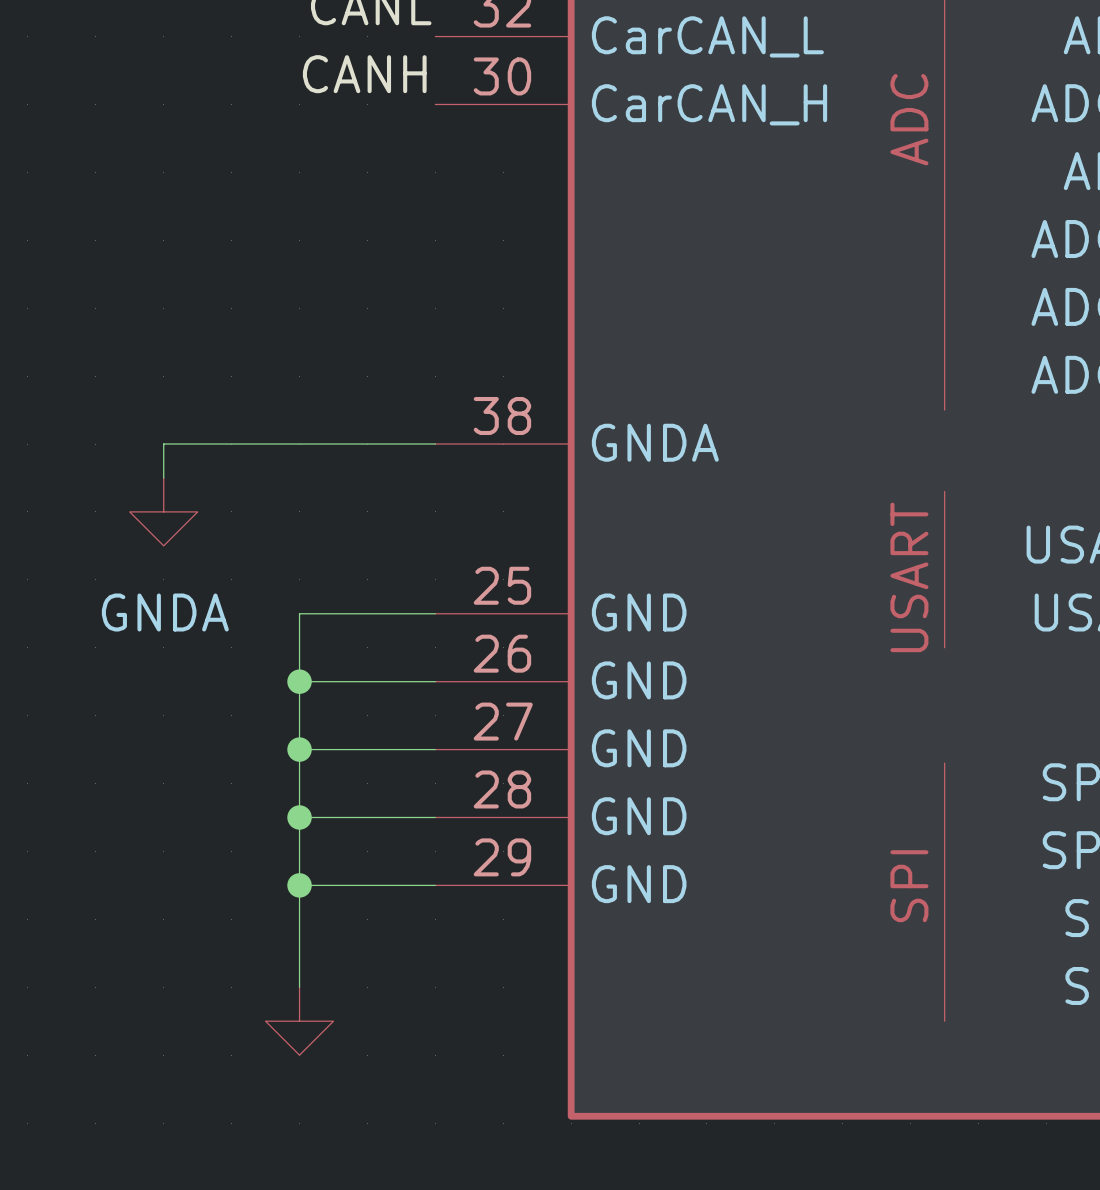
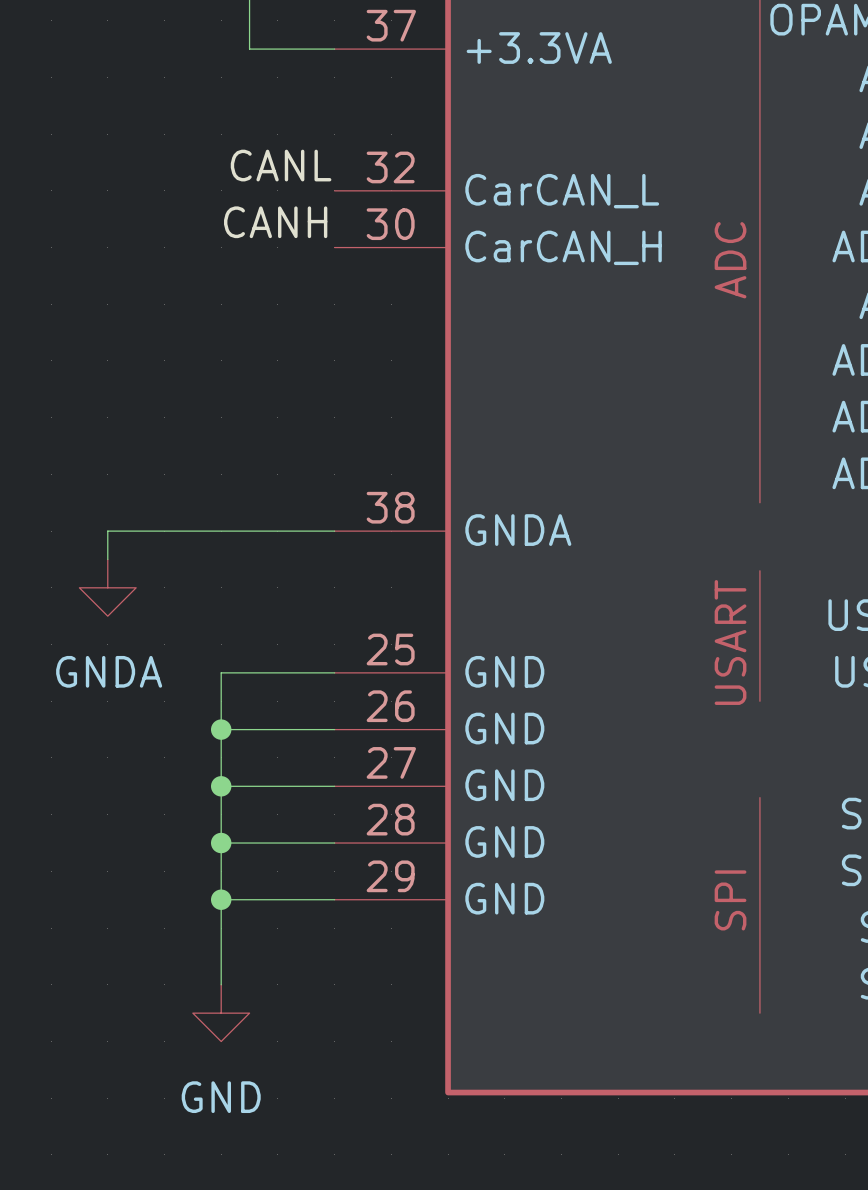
power symbol text: none -> GND (221, 1097)

